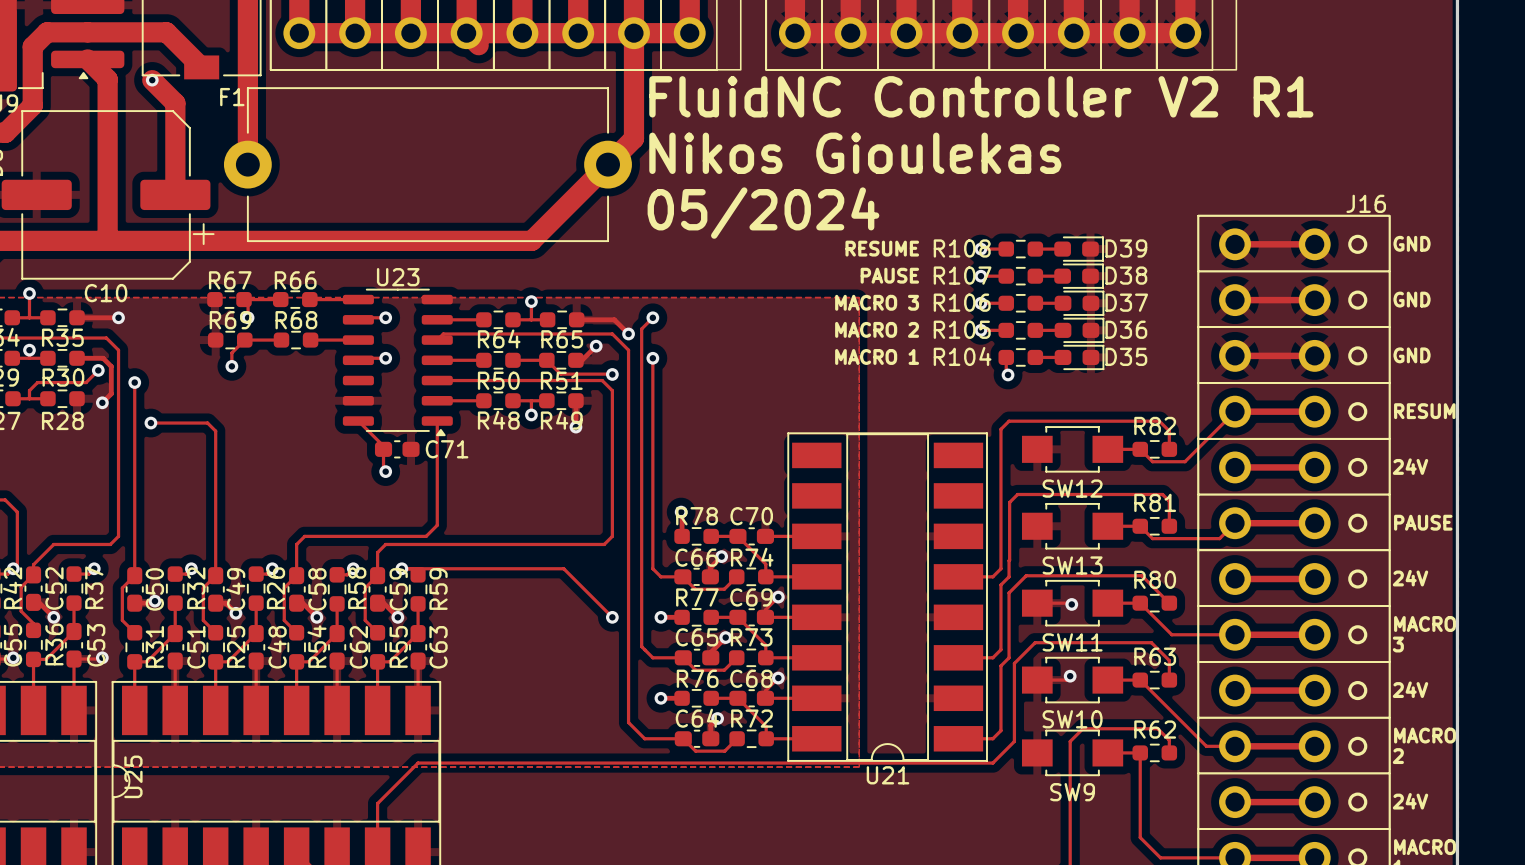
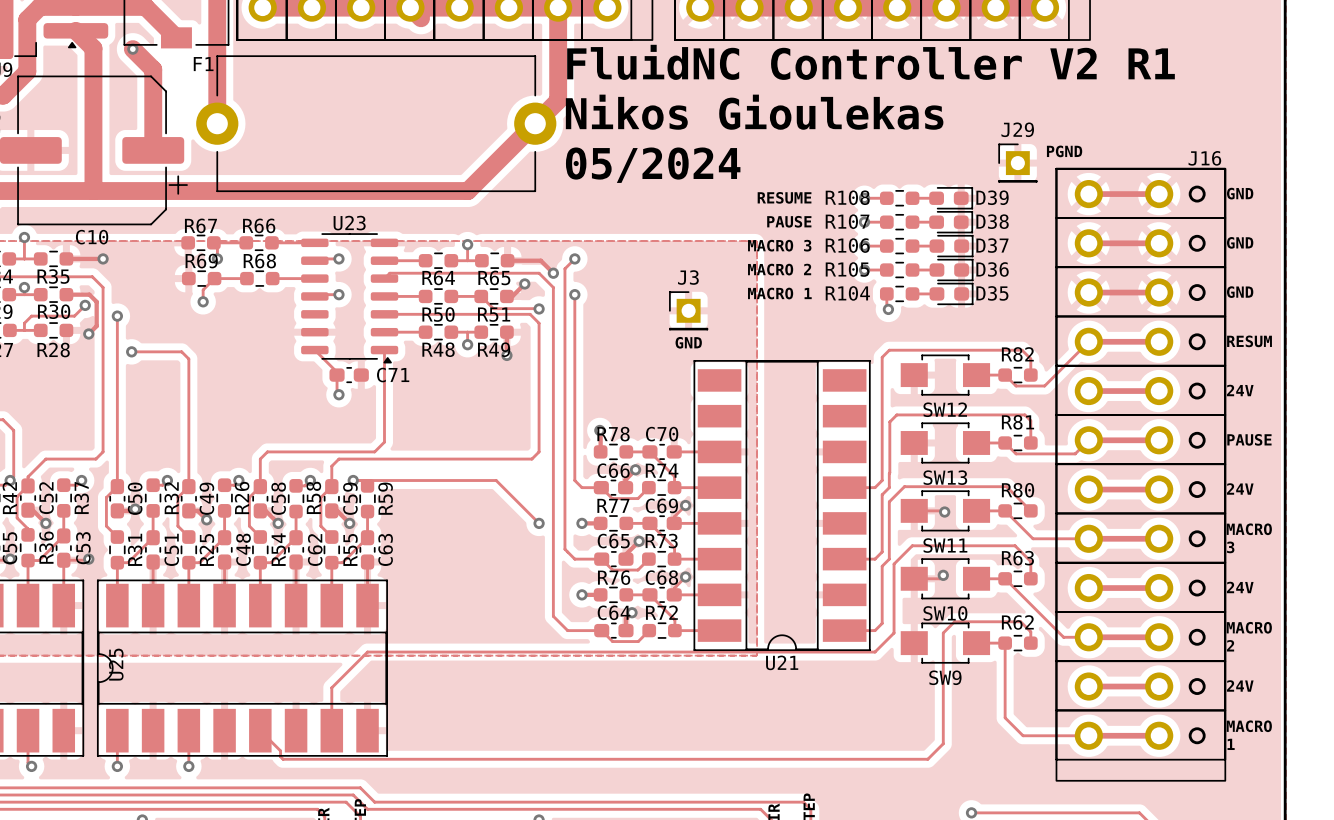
text: none -> PGND (1064, 151)
J29: none -> (1017, 163)
J3: none -> (688, 310)
text: none -> GND (688, 342)

